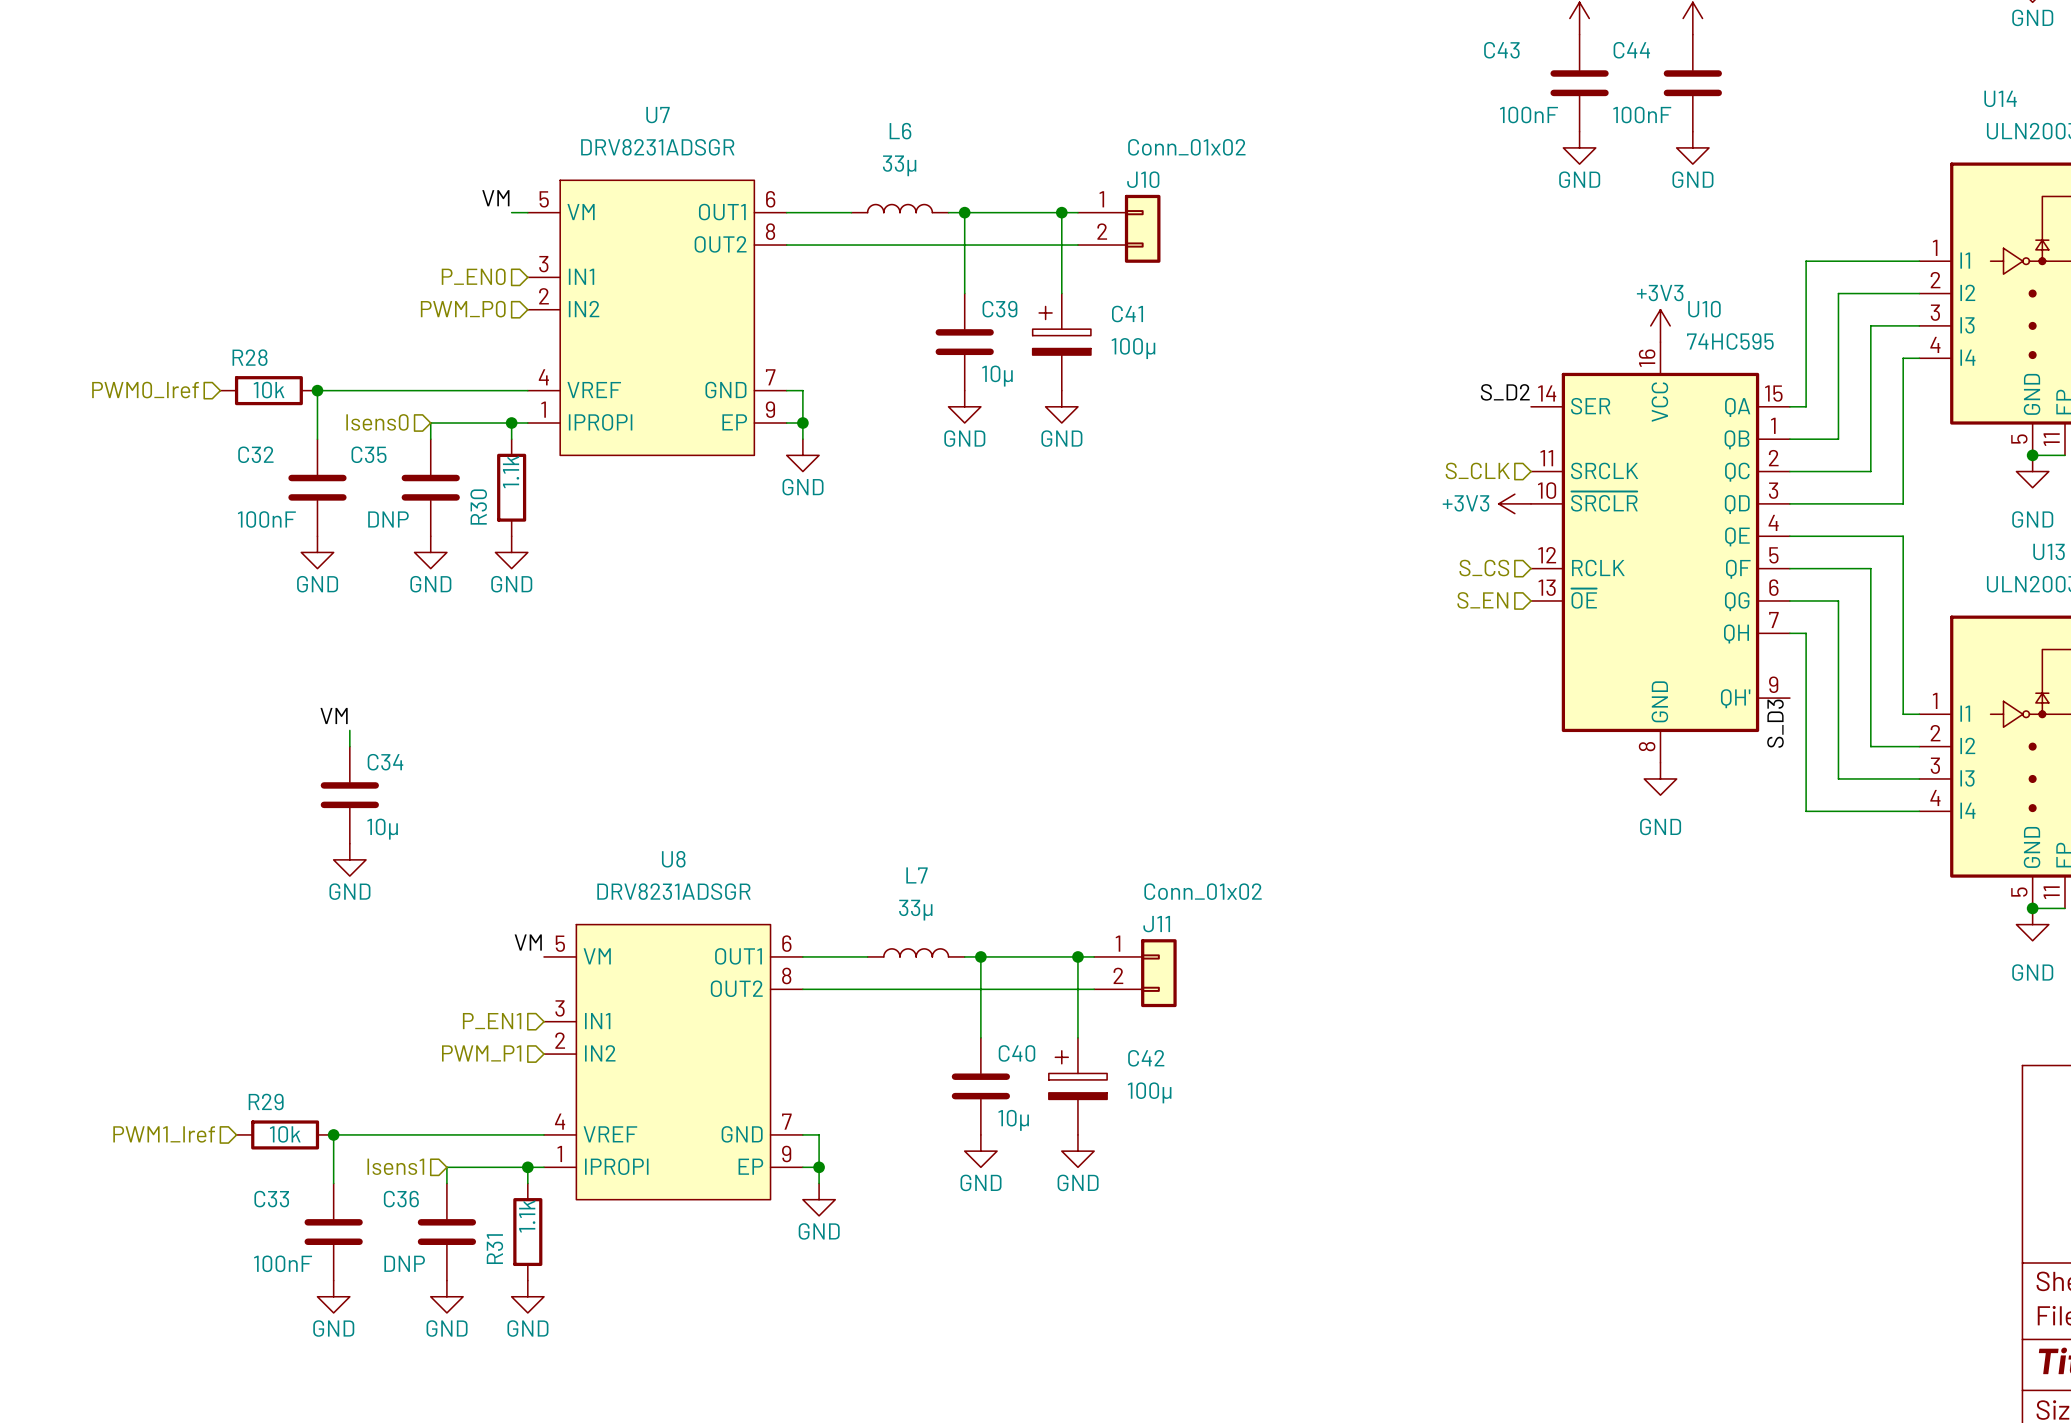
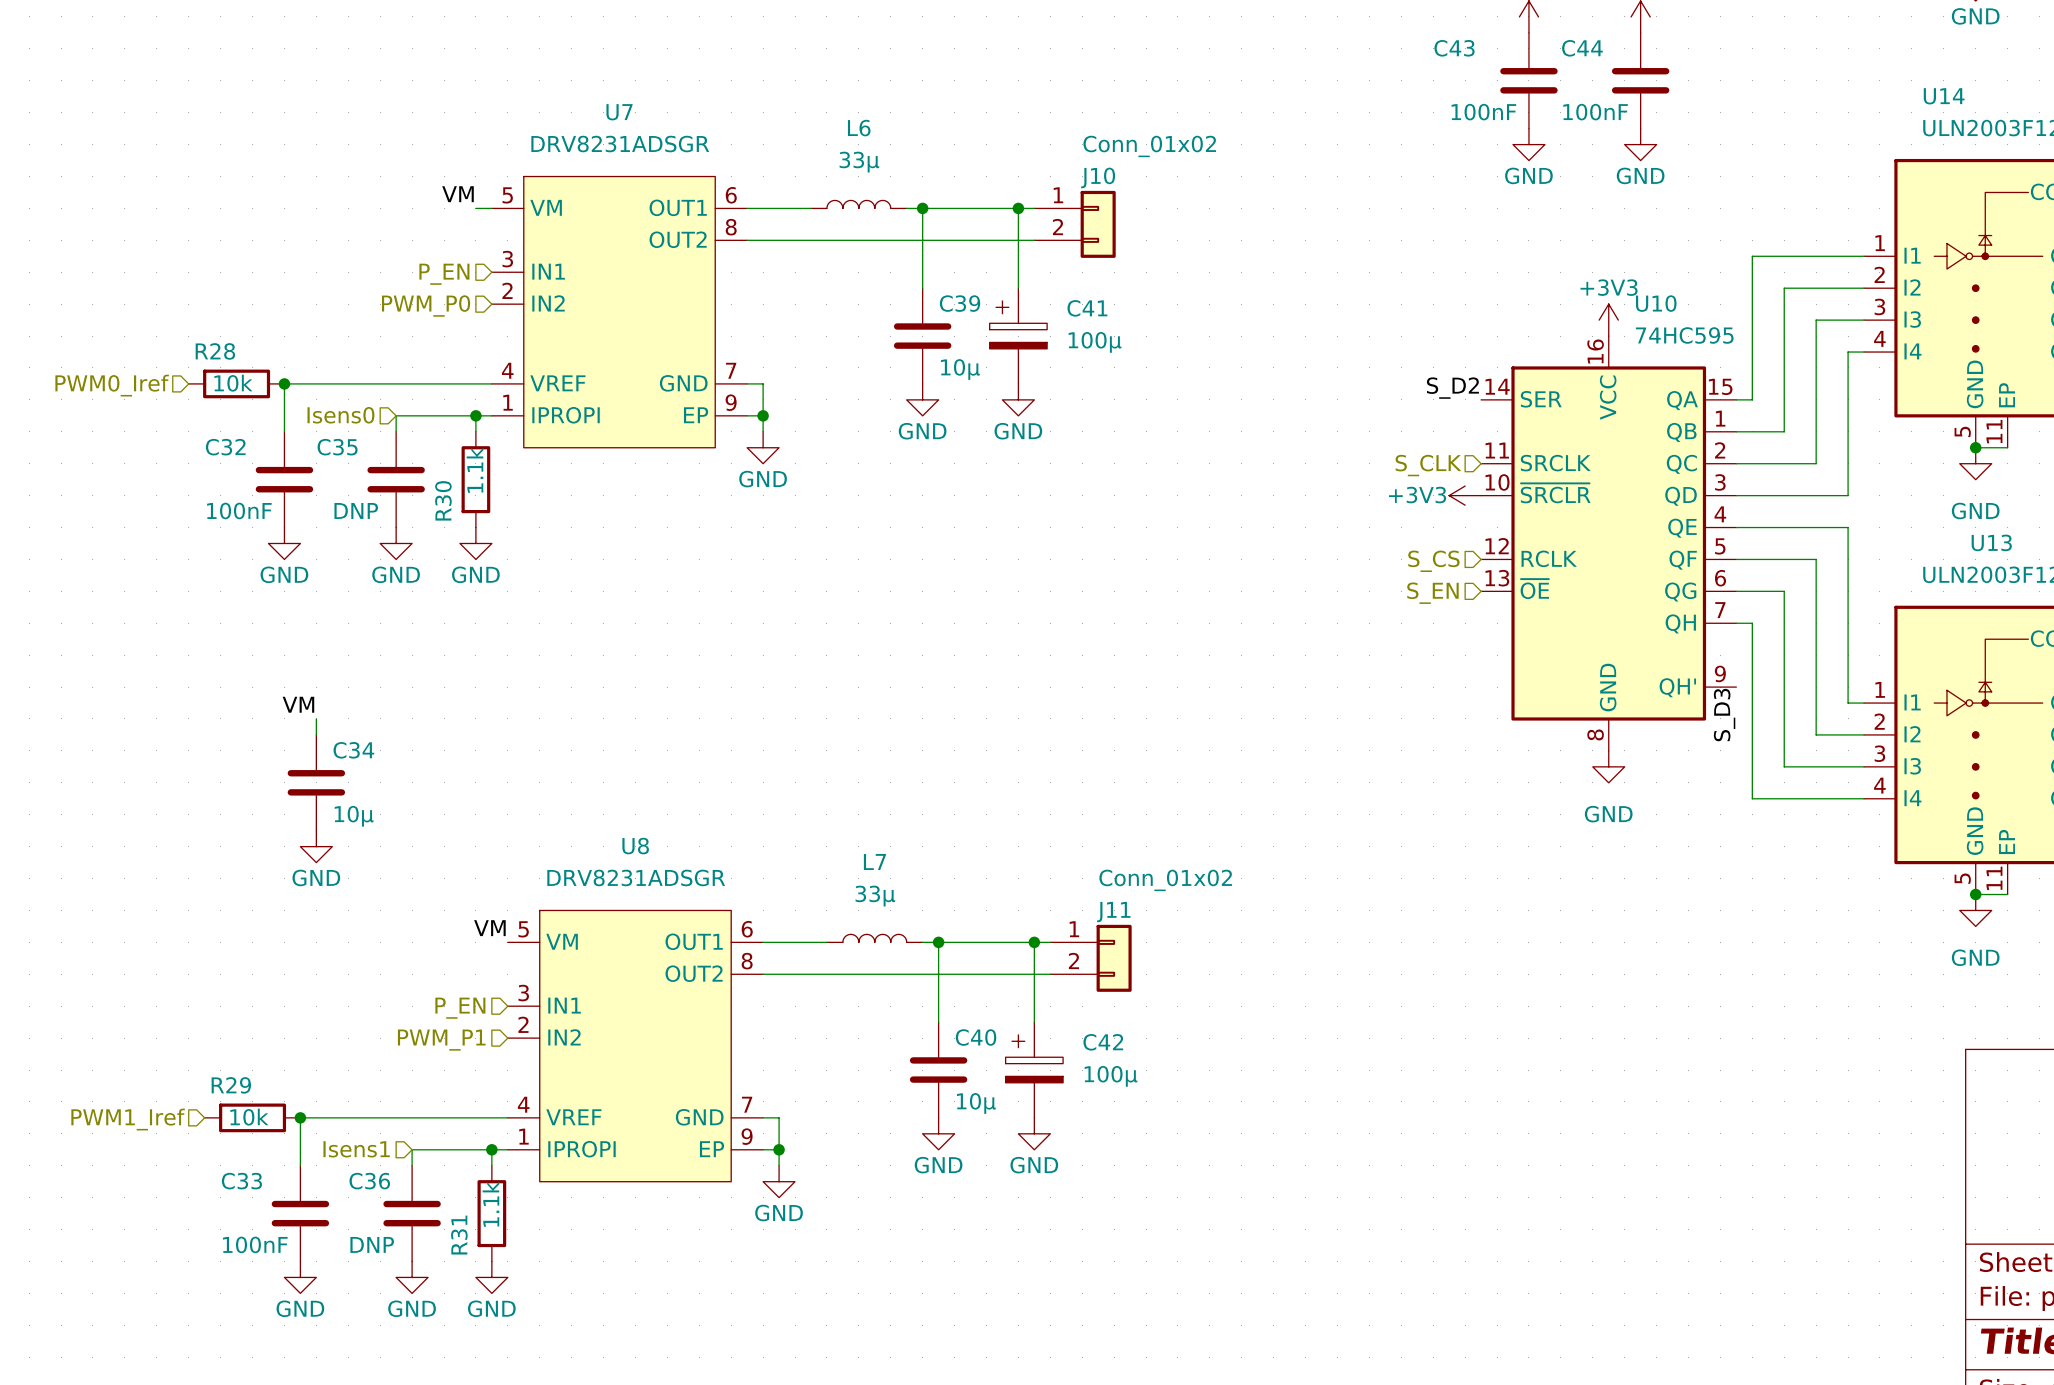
hierarchical label: P_EN0 (473, 276) -> P_EN (444, 274)
hierarchical label: P_EN1 (492, 1021) -> P_EN (460, 1008)

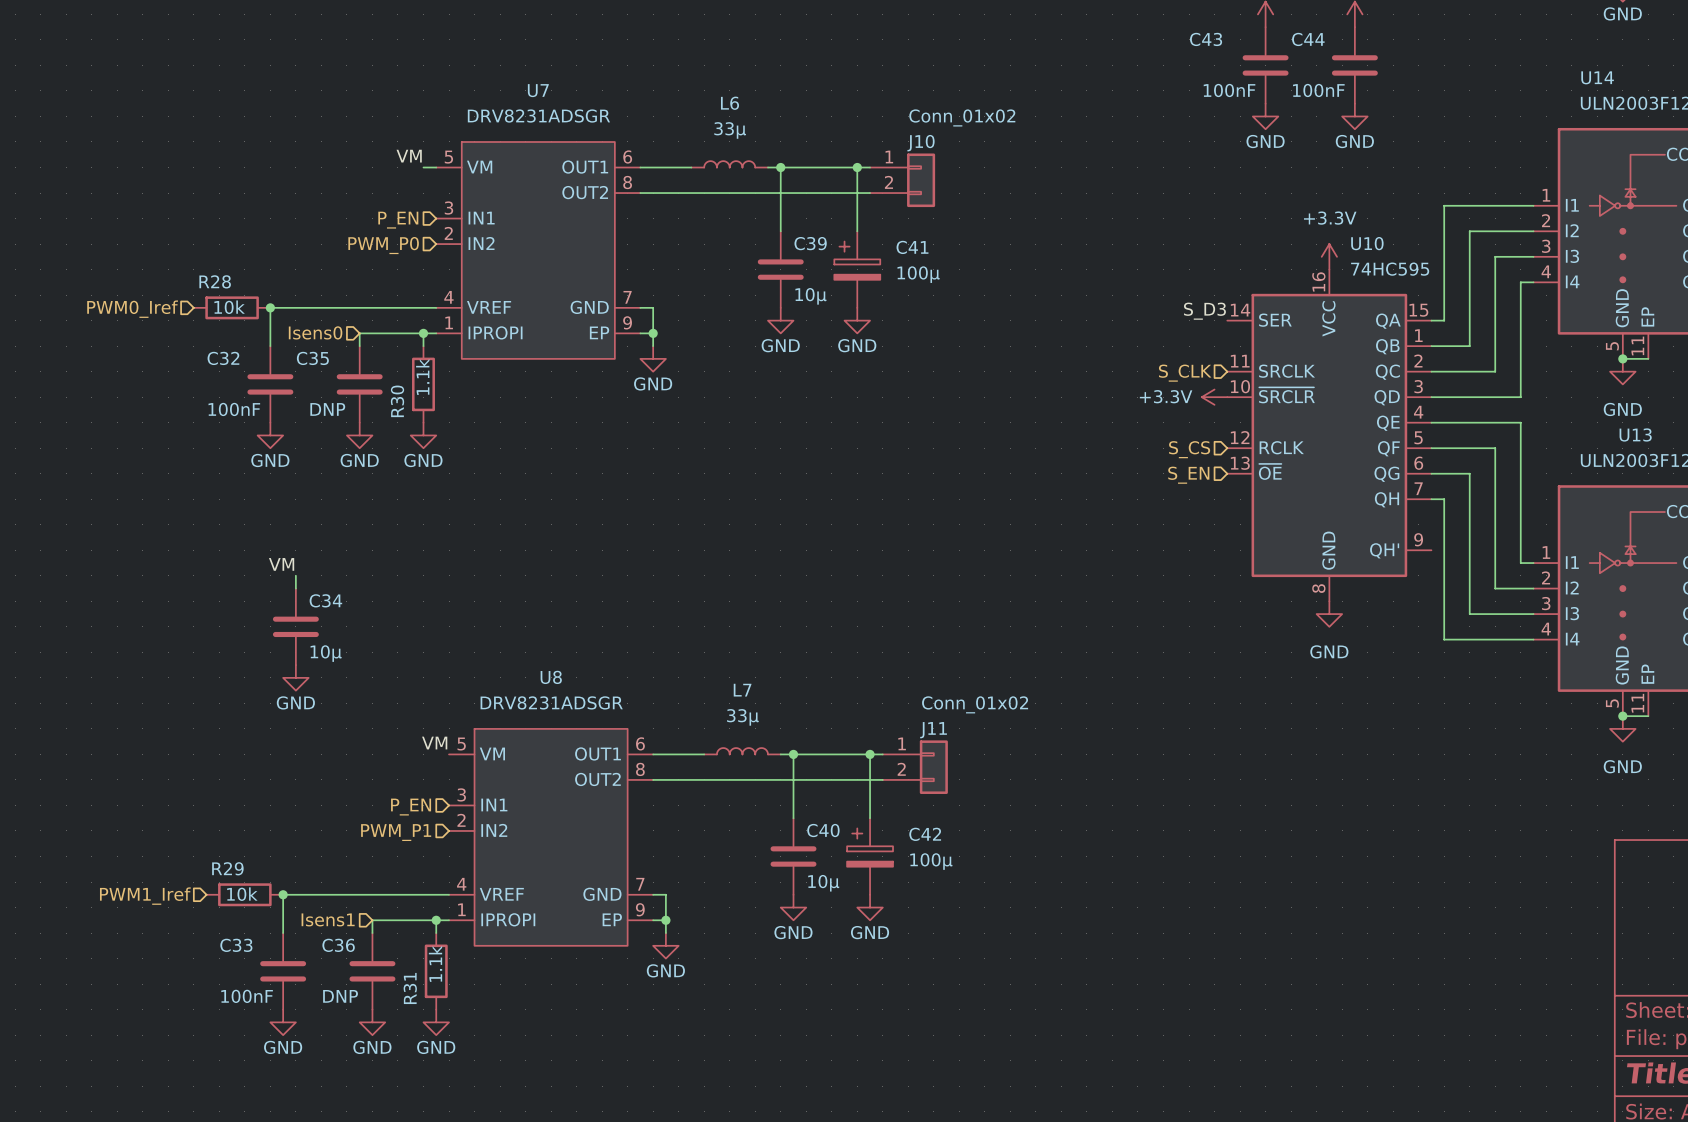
power symbol: +3V3 (1608, 320) -> +3.3V (1329, 256)
label: S_D2 (1452, 388) -> S_D3 (1204, 311)
power symbol: +3V3 (1465, 495) -> +3.3V (1214, 397)
label: S_D3 (1724, 715) -> none

